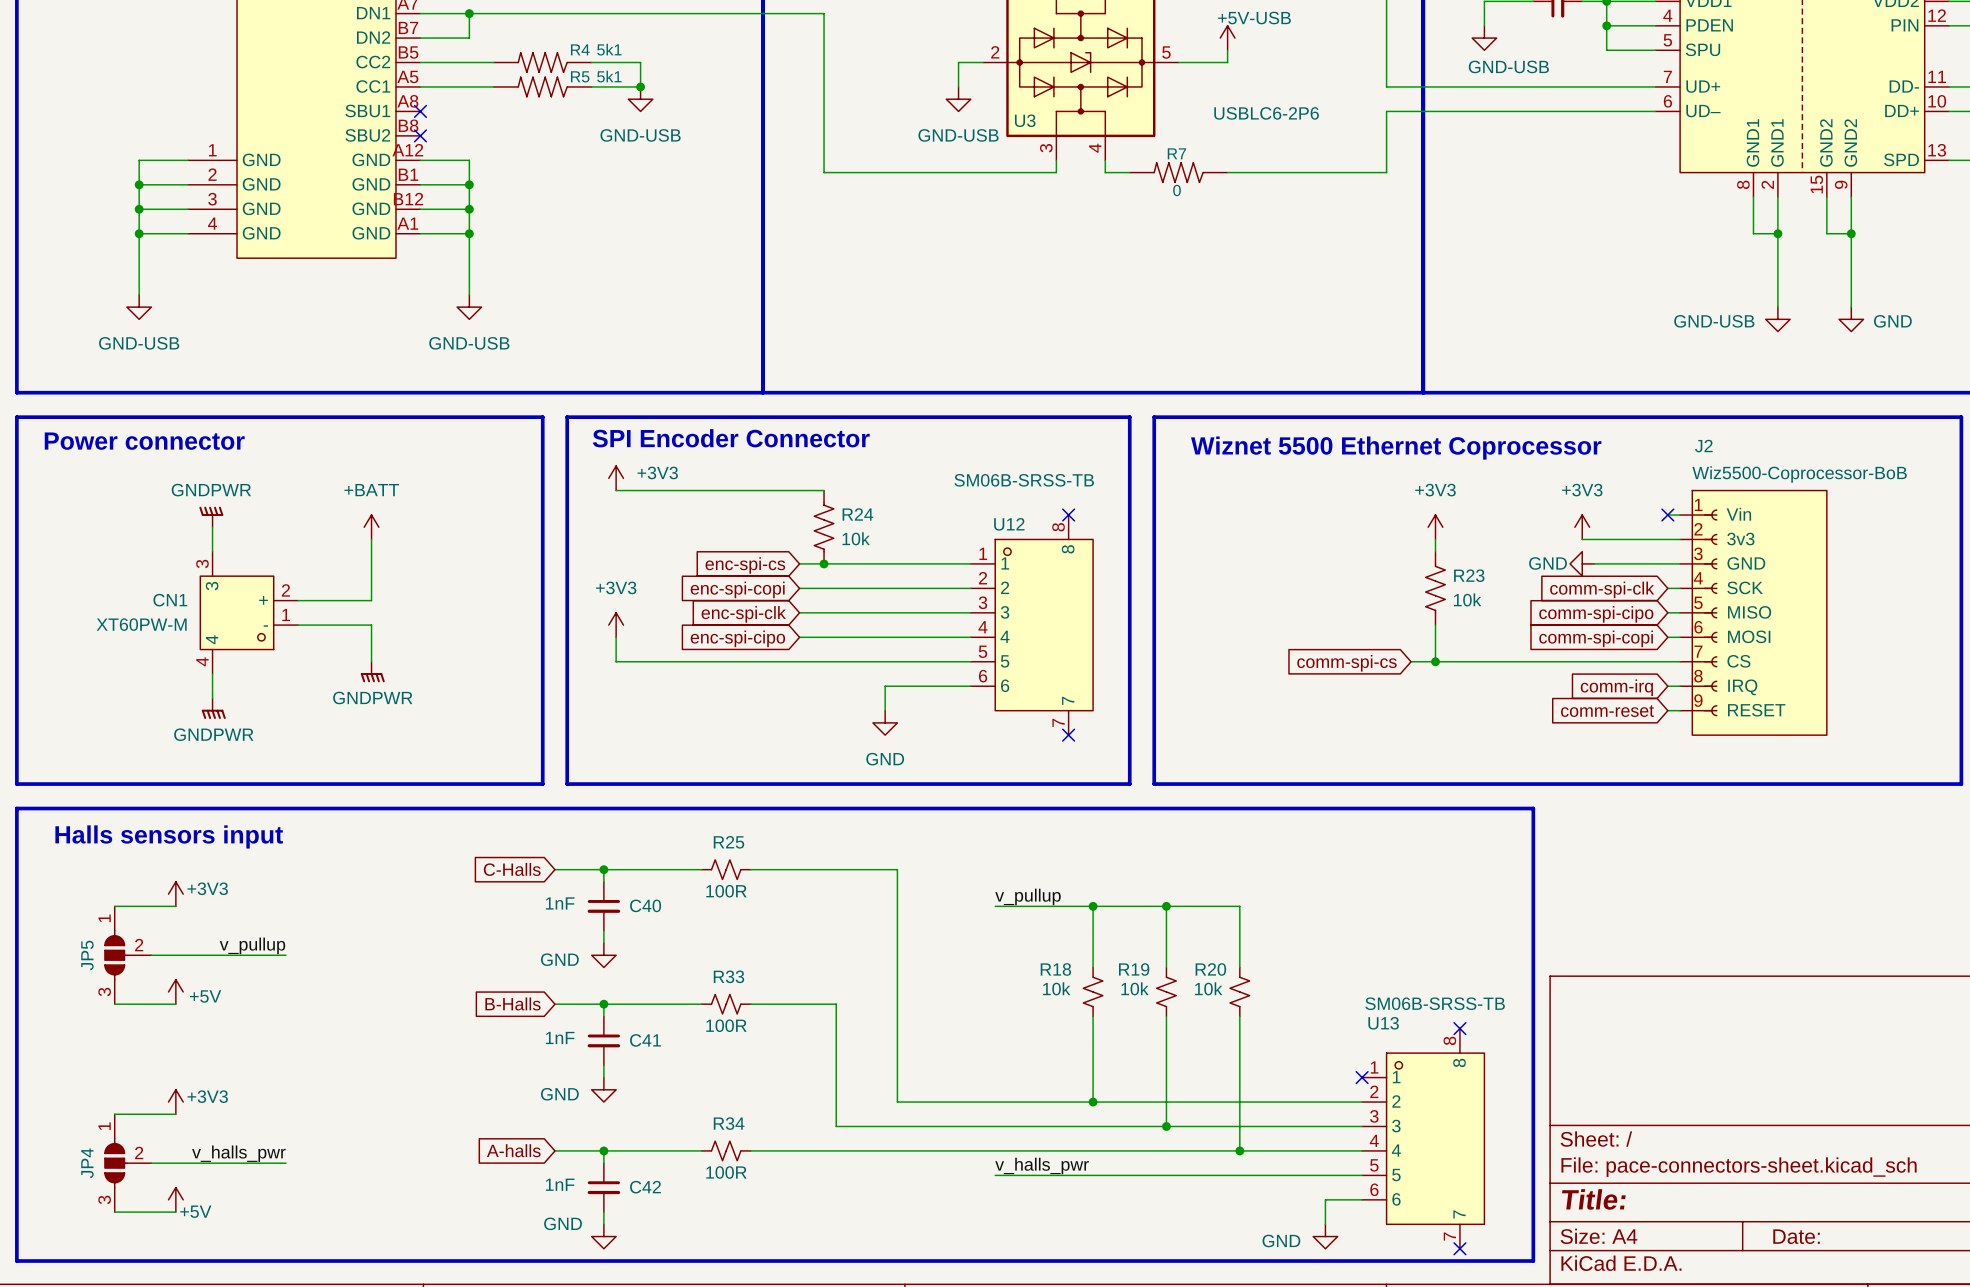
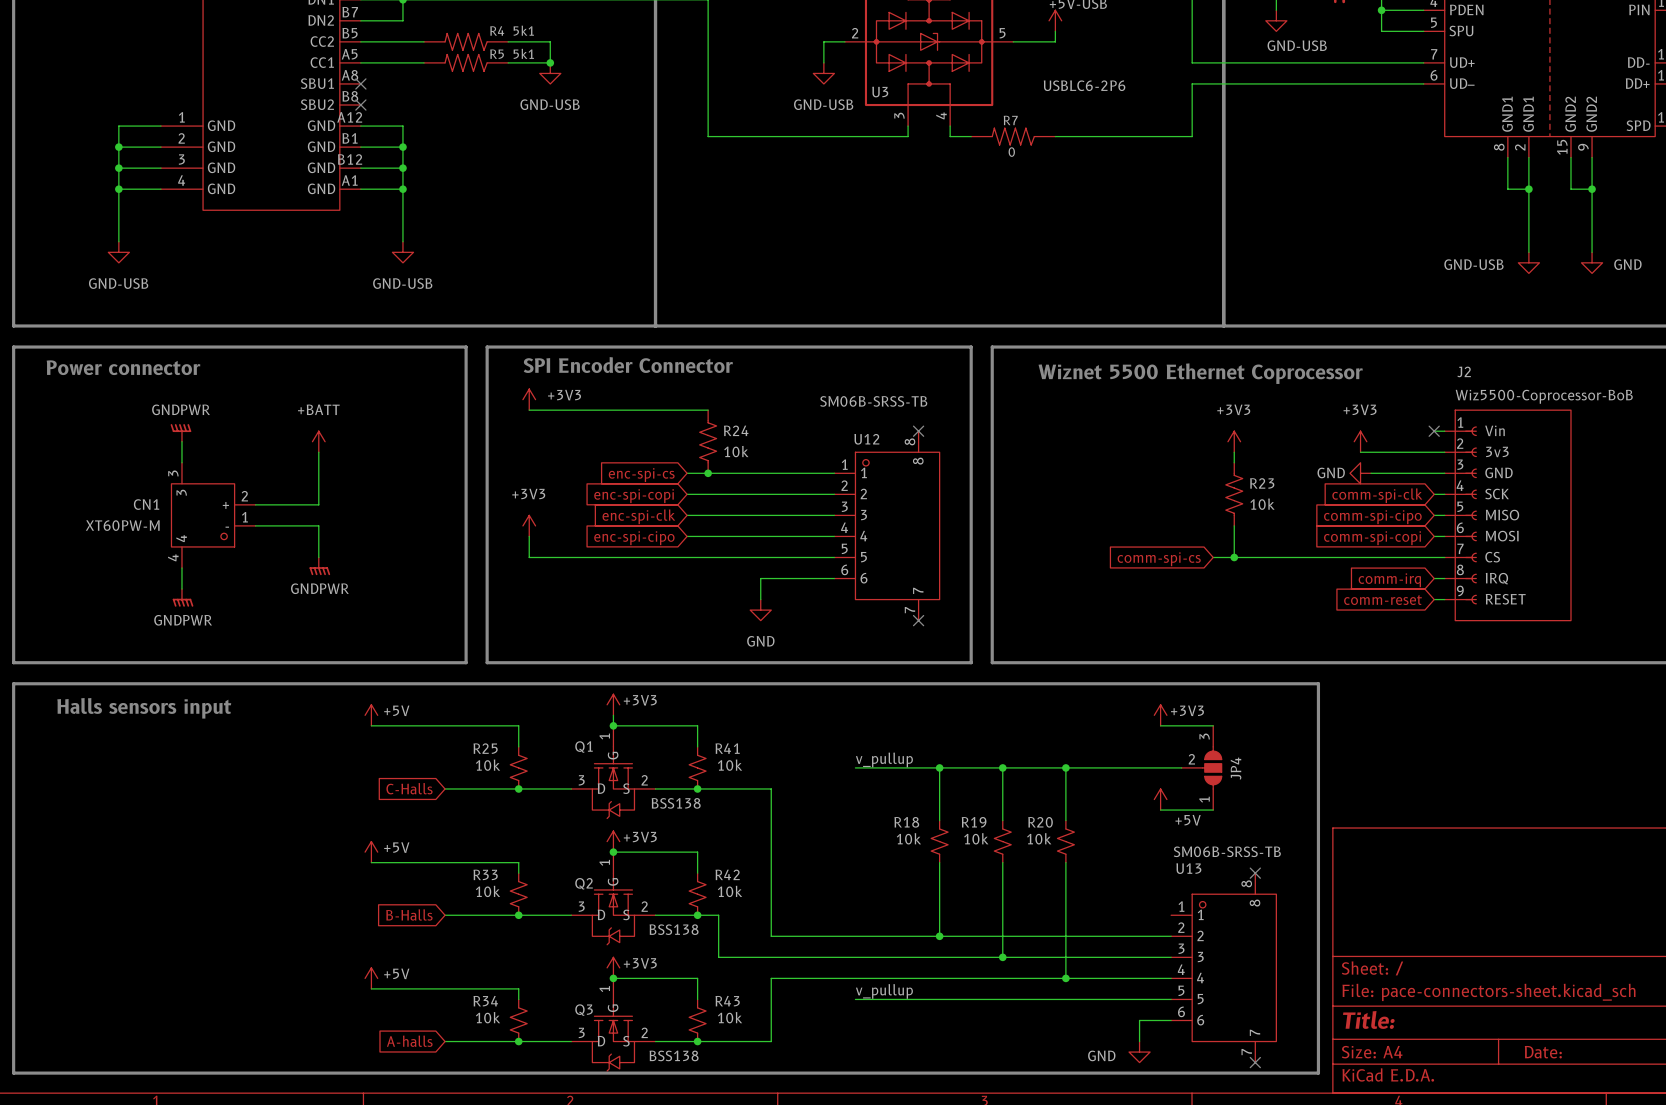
power symbol: none -> +3V3 (613, 704)
R25 name position: R25 (728, 842) -> R25 (485, 748)
power symbol: none -> +5V (371, 715)
wire: none -> (613, 715) (613, 725) (697, 725) (697, 746)
power symbol: none -> +3V3 (1160, 715)
wire: none -> (371, 725) (518, 725) (518, 736)
junction: none -> (613, 725)
wire: none -> (1160, 725) (1213, 725)
global label position: C-Halls (512, 869) -> C-Halls (409, 788)
wire: (554, 869) (701, 869) -> none
junction: (603, 869) -> none
R25 rotation: 0° (726, 869) -> 90° clockwise (518, 767)
R25 position: (726, 869) -> (518, 767)
wire: (750, 869) (897, 869) (897, 930) -> (655, 788) (771, 788)
R25 value: 100R (726, 891) -> 10k (488, 765)
power symbol: +3V3 (175, 894) -> none
wire: (114, 906) (175, 906) -> none
C40: 1nF (603, 906) -> none
R41: none -> 10k (697, 767)
wire: none -> (1065, 767) (1181, 767)
junction: none -> (1065, 767)
Q1: none -> BSS138 (613, 772)
wire: (603, 930) (603, 943) -> none
junction: none -> (518, 788)
junction: none -> (697, 788)
power symbol: none -> +5V (1160, 799)
label: v_pullup (252, 945) -> none
JP5: (127, 955) -> none
wire: (151, 955) (285, 955) -> none
power symbol: GND (603, 955) -> none
wire: none -> (1160, 810) (1213, 810)
R33 name position: R33 (728, 976) -> R33 (485, 874)
power symbol: +5V (175, 991) -> none
power symbol: none -> +3V3 (613, 841)
global label position: B-Halls (512, 1003) -> B-Halls (409, 914)
wire: (114, 1004) (175, 1004) -> none
power symbol: none -> +5V (371, 852)
wire: (554, 1004) (701, 1004) -> (445, 788) (571, 788)
wire: (603, 1004) (603, 1016) -> none
junction: (603, 1004) -> none
wire: none -> (613, 852) (644, 852)
junction: none -> (613, 852)
R33 rotation: 0° (726, 1004) -> 90° clockwise (518, 894)
R33 position: (726, 1004) -> (518, 894)
wire: (811, 1004) (836, 1004) (836, 1077) -> (697, 852) (697, 873)
wire: none -> (371, 862) (518, 862) (518, 873)
R33 value: 100R (726, 1025) -> 10k (488, 891)
C41: 1nF (603, 1040) -> none
R42: none -> 10k (697, 894)
Q2: none -> BSS138 (613, 898)
junction: none -> (518, 915)
wire: none -> (655, 915) (718, 915)
junction: none -> (697, 915)
no-connect mark: (1362, 1077) -> none
power symbol: GND (603, 1089) -> none
power symbol: +3V3 (175, 1102) -> none
wire: (114, 1114) (175, 1114) -> none
R34 name position: R34 (729, 1123) -> R34 (485, 1001)
power symbol: none -> +3V3 (613, 967)
power symbol: none -> +5V (371, 978)
global label position: A-halls (513, 1150) -> A-halls (409, 1041)
wire: (554, 1150) (701, 1150) -> (445, 915) (571, 915)
wire: (603, 1150) (603, 1163) -> none
junction: (603, 1150) -> none
wire: none -> (613, 978) (644, 978)
junction: none -> (613, 978)
R34 rotation: 0° (726, 1150) -> 90° clockwise (518, 1020)
R34 position: (726, 1150) -> (518, 1020)
wire: (811, 1150) (897, 1150) -> (655, 1041) (771, 1041) (771, 978)
wire: none -> (697, 978) (697, 999)
label: v_halls_pwr (238, 1153) -> none
JP4 rotation: 0° (115, 1163) -> 180° (1212, 767)
JP4 position: (127, 1163) -> (1201, 767)
wire: (151, 1163) (285, 1163) -> none
wire: none -> (371, 988) (518, 988) (518, 999)
label: v_halls_pwr (1042, 1166) -> v_pullup (884, 991)
R34 value: 100R (726, 1172) -> 10k (488, 1017)
C42: 1nF (603, 1187) -> none
power symbol: +5V (175, 1199) -> none
R43: none -> 10k (697, 1020)
Q3: none -> BSS138 (613, 1024)
wire: (114, 1212) (175, 1212) -> none
wire: none -> (445, 1041) (571, 1041)
junction: none -> (518, 1041)
junction: none -> (697, 1041)
power symbol: GND (603, 1236) -> none

